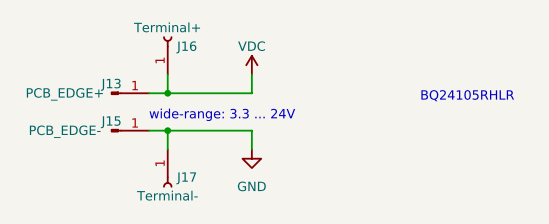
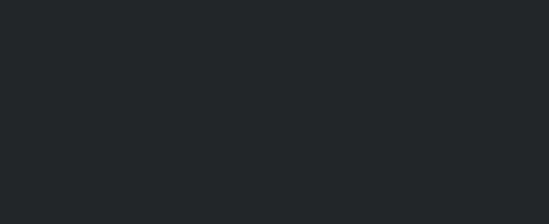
J16: Terminal+ (167, 55) -> none
power symbol: VDC (251, 65) -> none
wire: (167, 74) (167, 93) -> none
wire: (251, 74) (251, 93) (149, 93) -> none
J13: PCB_EDGE+ (130, 93) -> none
junction: (167, 93) -> none
text: BQ24105RHLR (467, 95) -> none
text: wide-range: 3.3 ... 24V (222, 114) -> none
J15: PCB_EDGE- (130, 130) -> none
wire: (149, 130) (251, 130) (251, 149) -> none
wire: (167, 130) (167, 149) -> none
junction: (167, 130) -> none
power symbol: GND (251, 158) -> none
J17: Terminal- (167, 168) -> none

